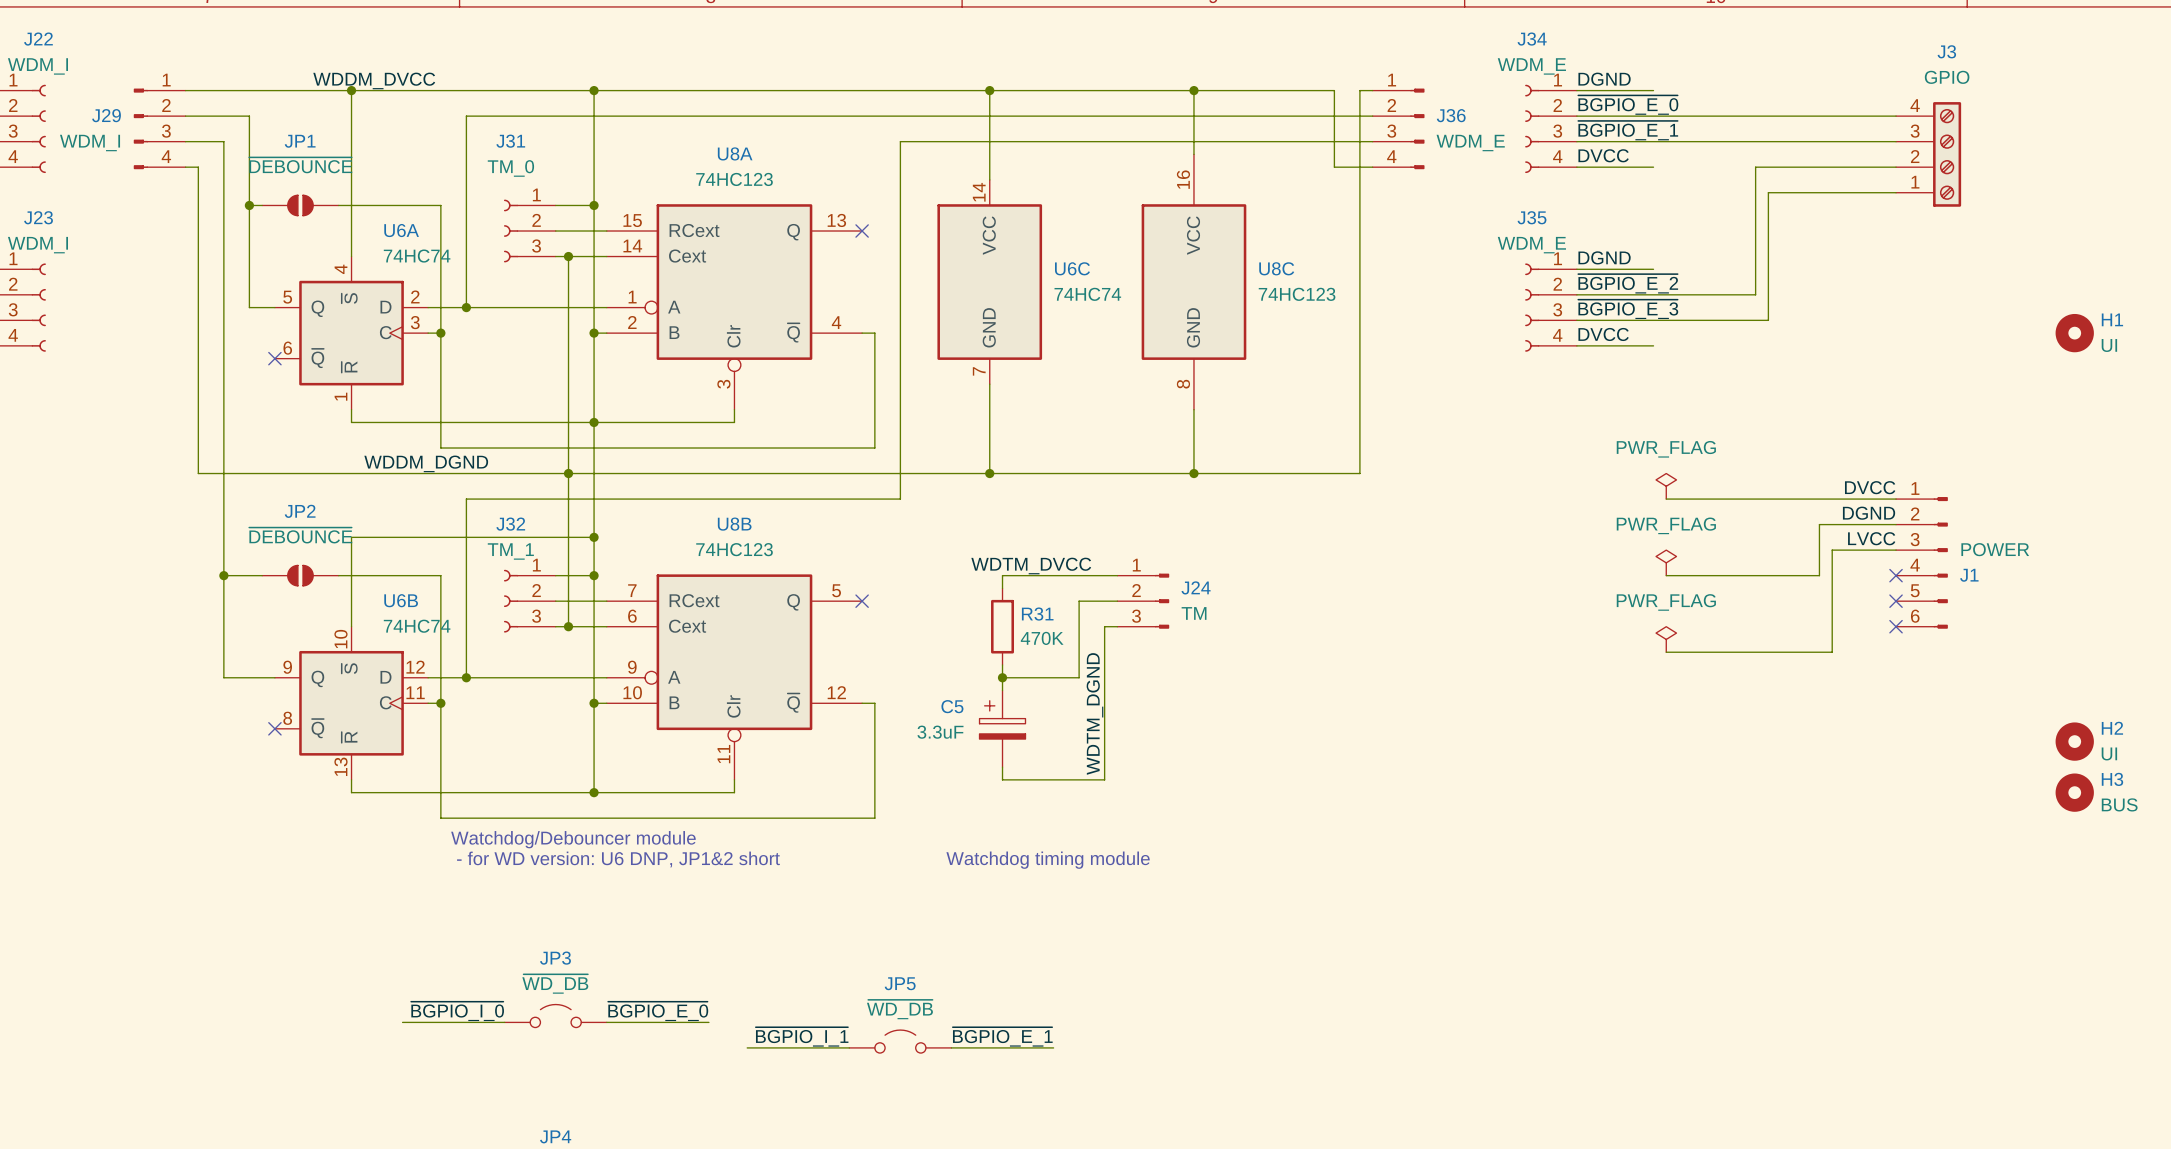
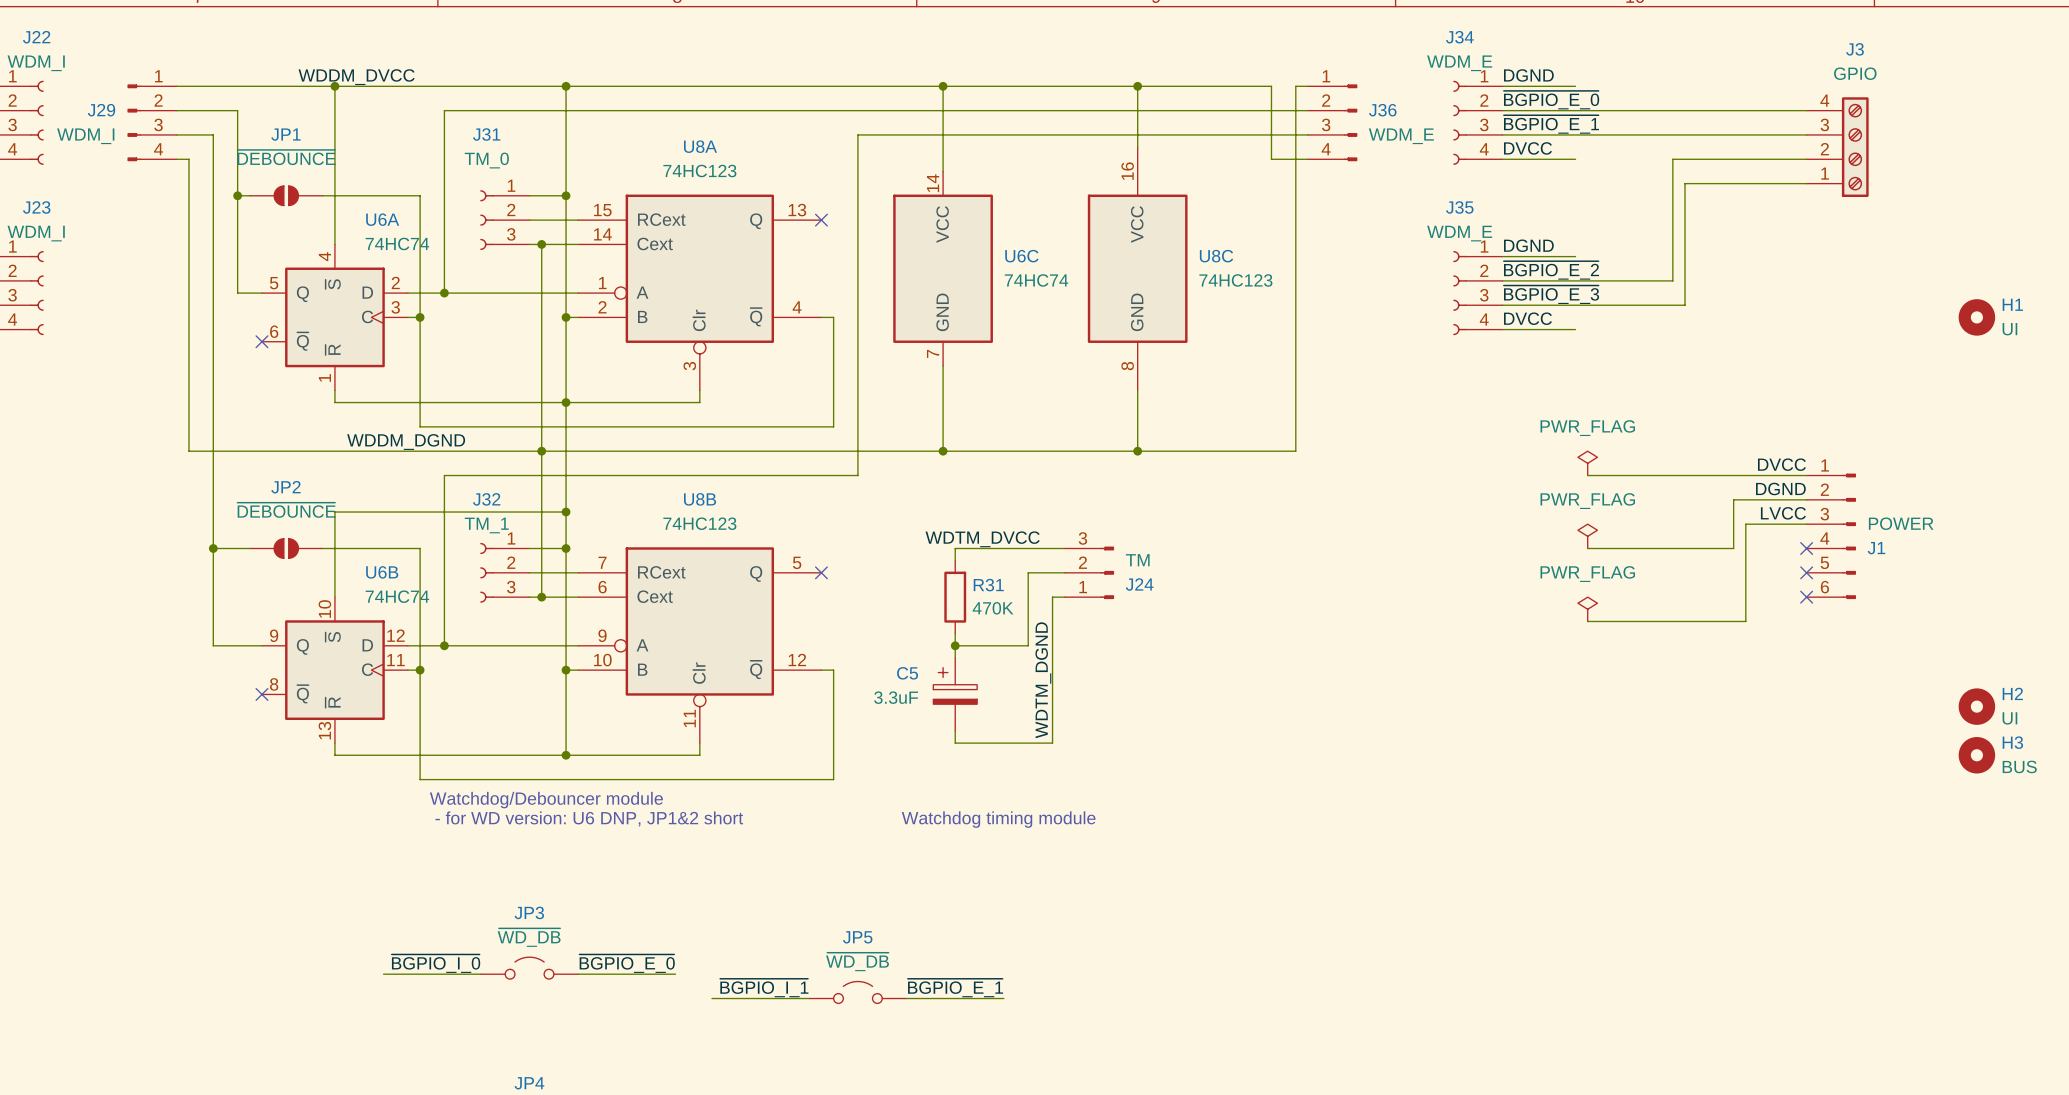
J24 flip: as is (1162, 601) -> up-down (1107, 572)

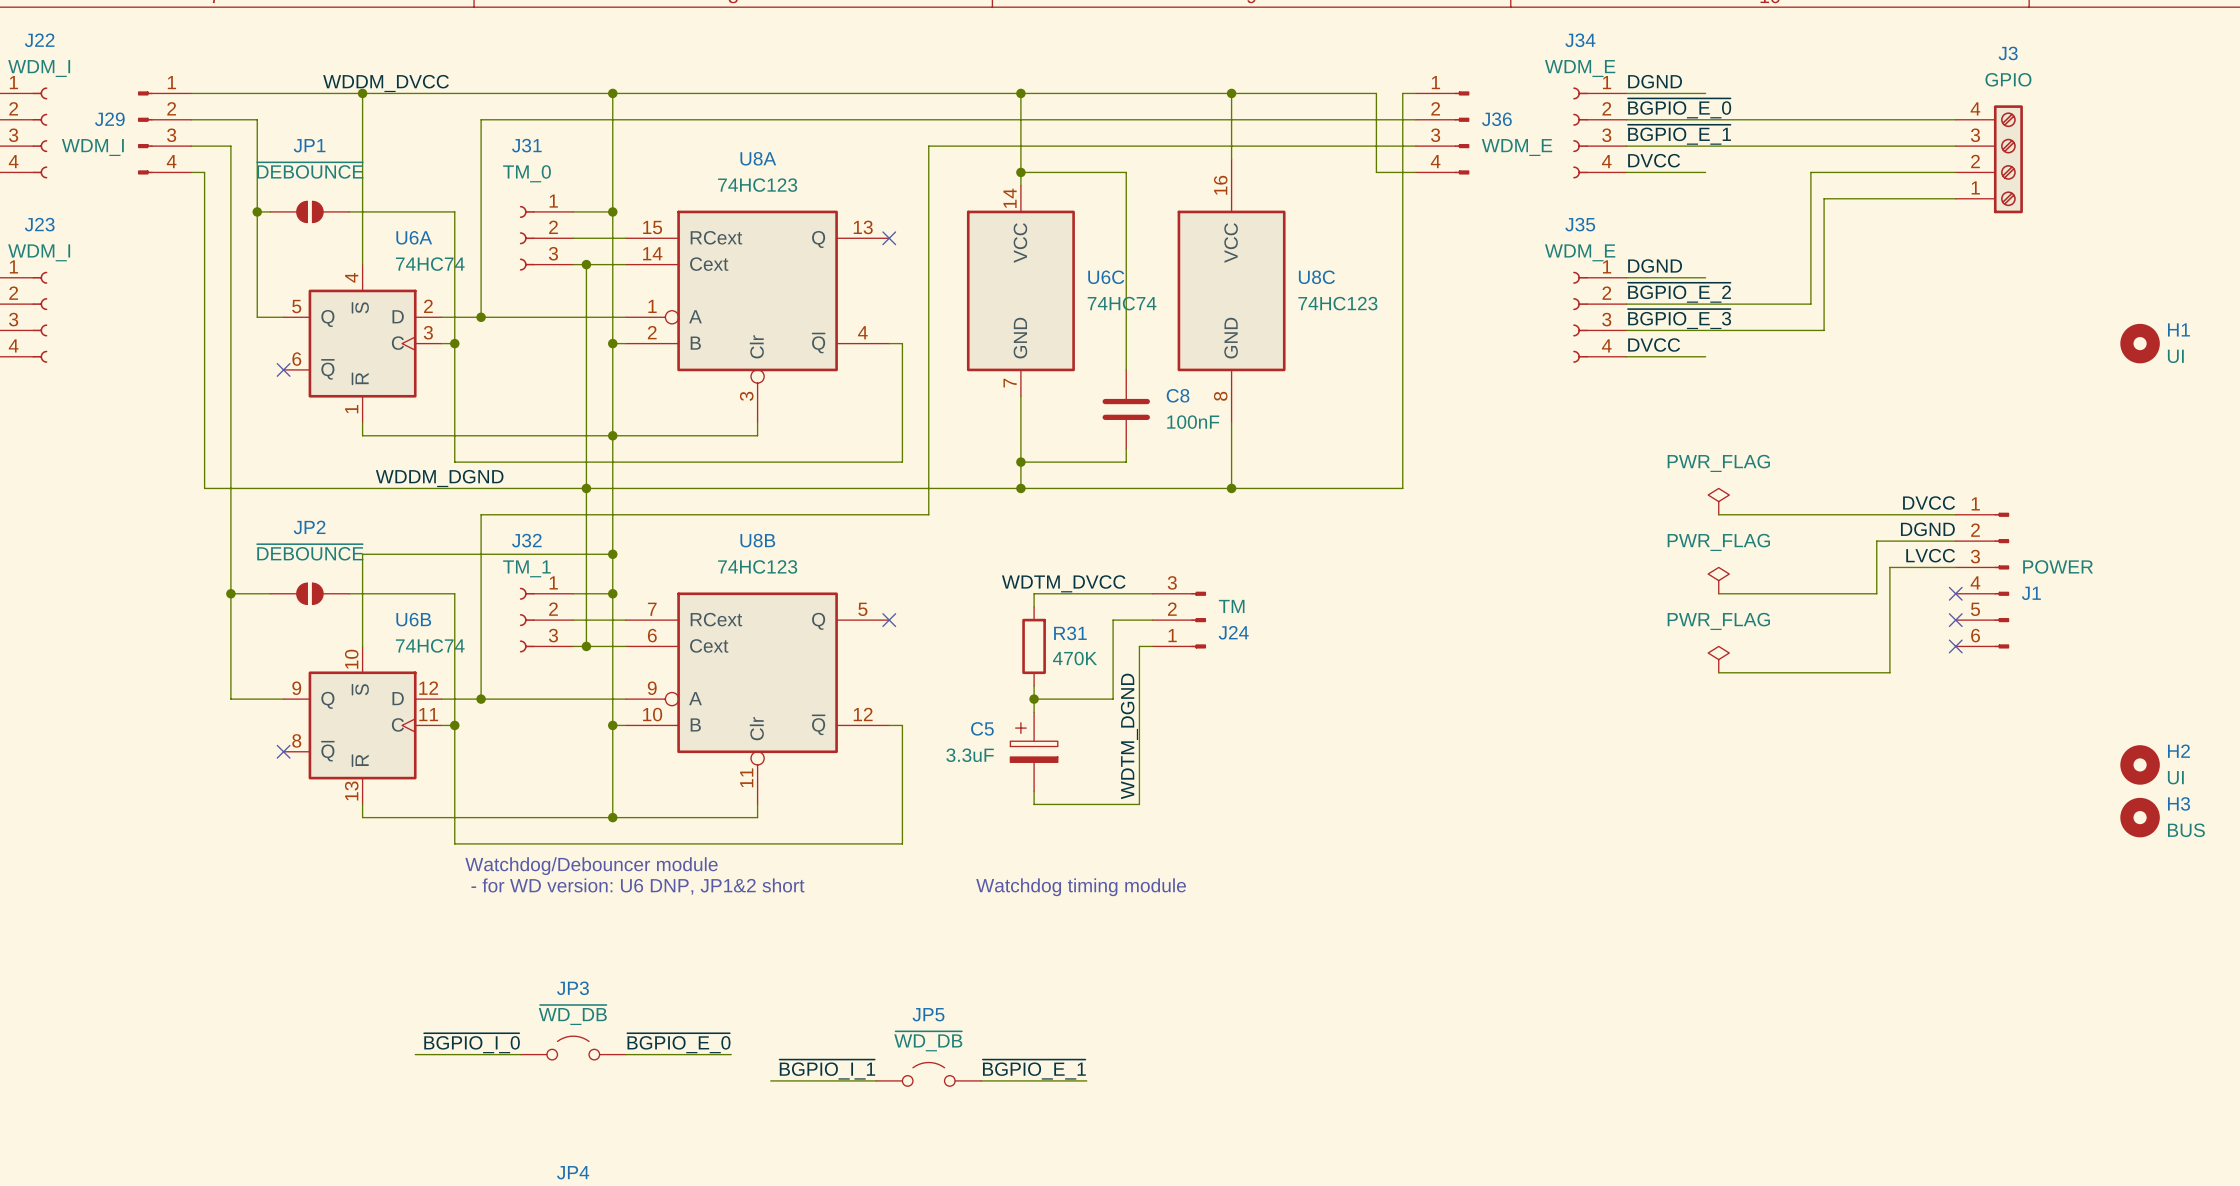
wire: none -> (1020, 172) (1126, 172) (1126, 369)
junction: none -> (1020, 172)
C8: none -> 100nF (1126, 409)
wire: none -> (1126, 448) (1126, 462) (1020, 462)
junction: none -> (1020, 462)

